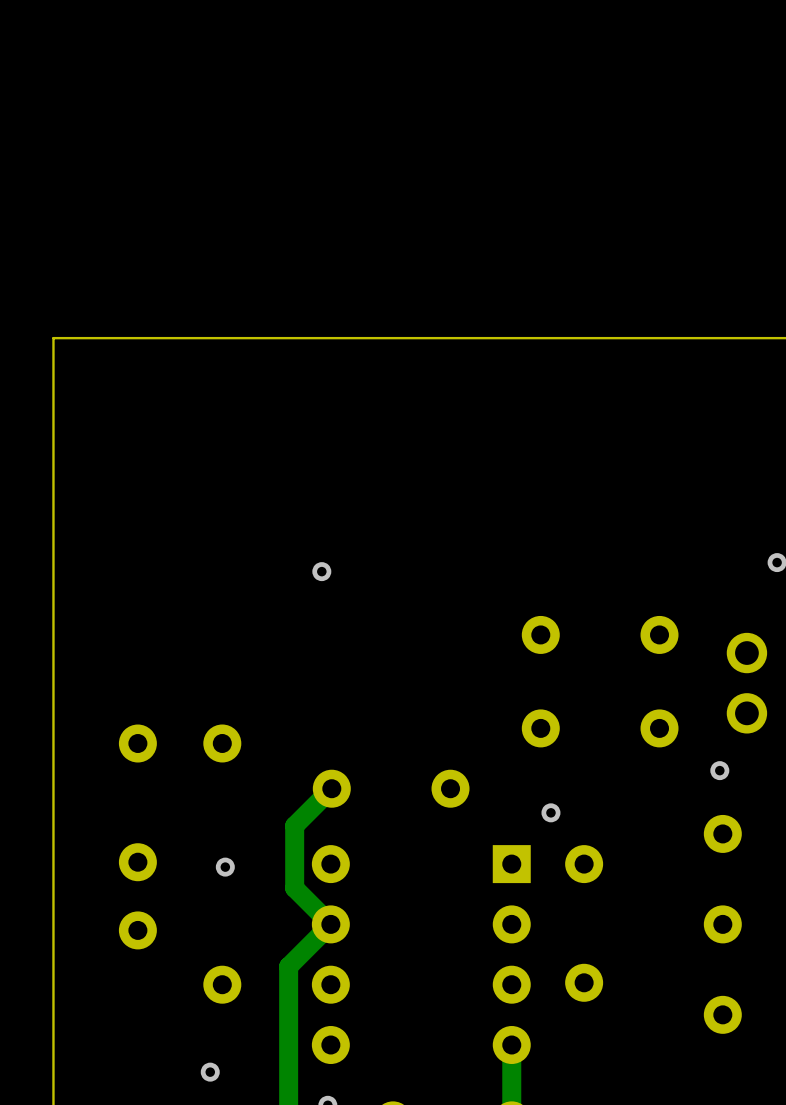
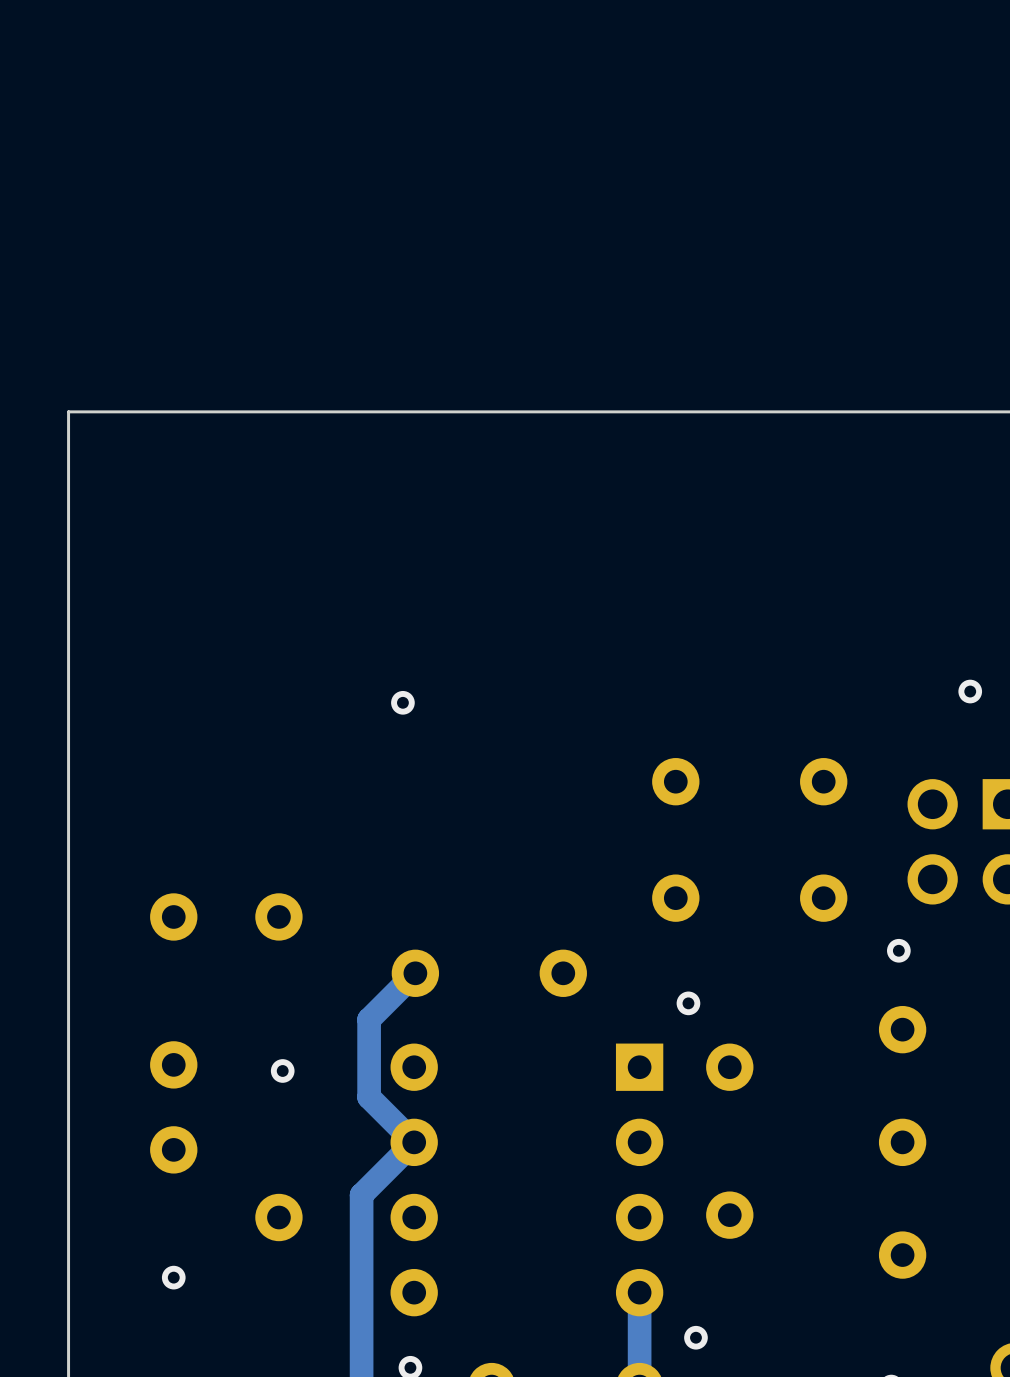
via position: (210, 1072) -> (173, 1277)
via: none -> (695, 1337)

